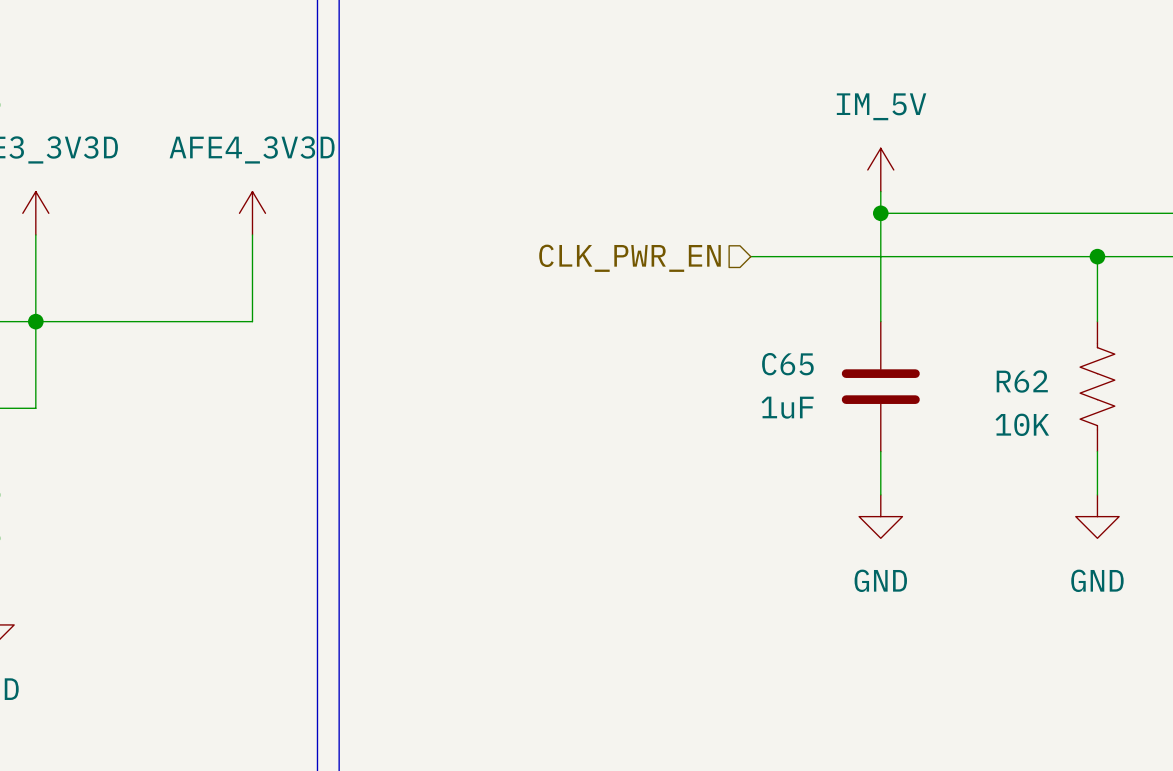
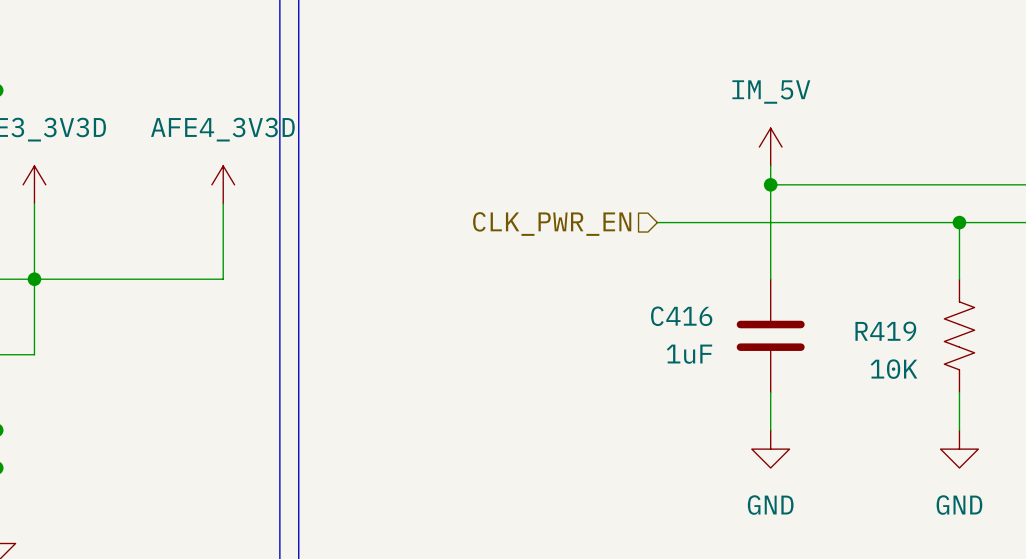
C65 name: C65 (787, 364) -> C416 (681, 316)
R62 name: R62 (1022, 381) -> R419 (885, 331)

